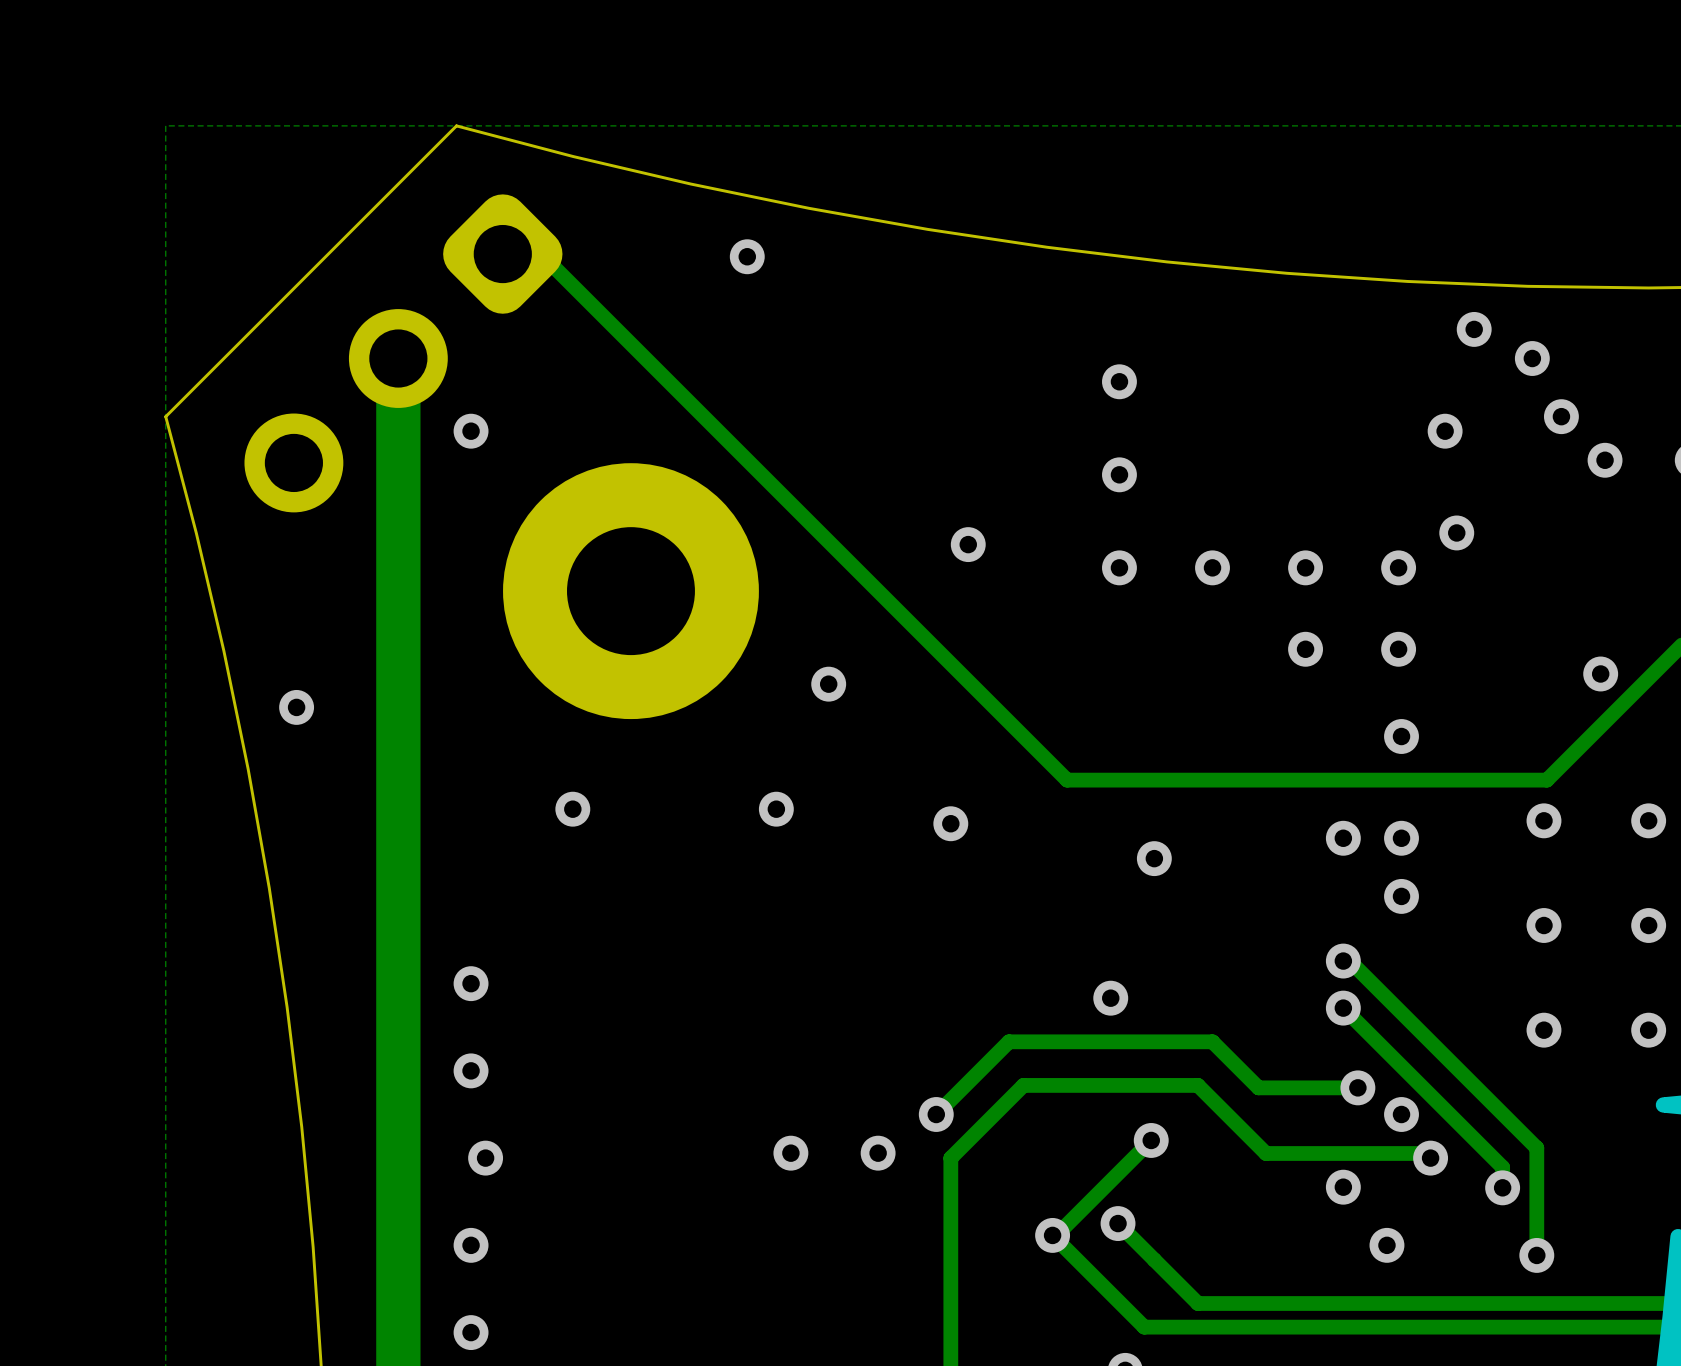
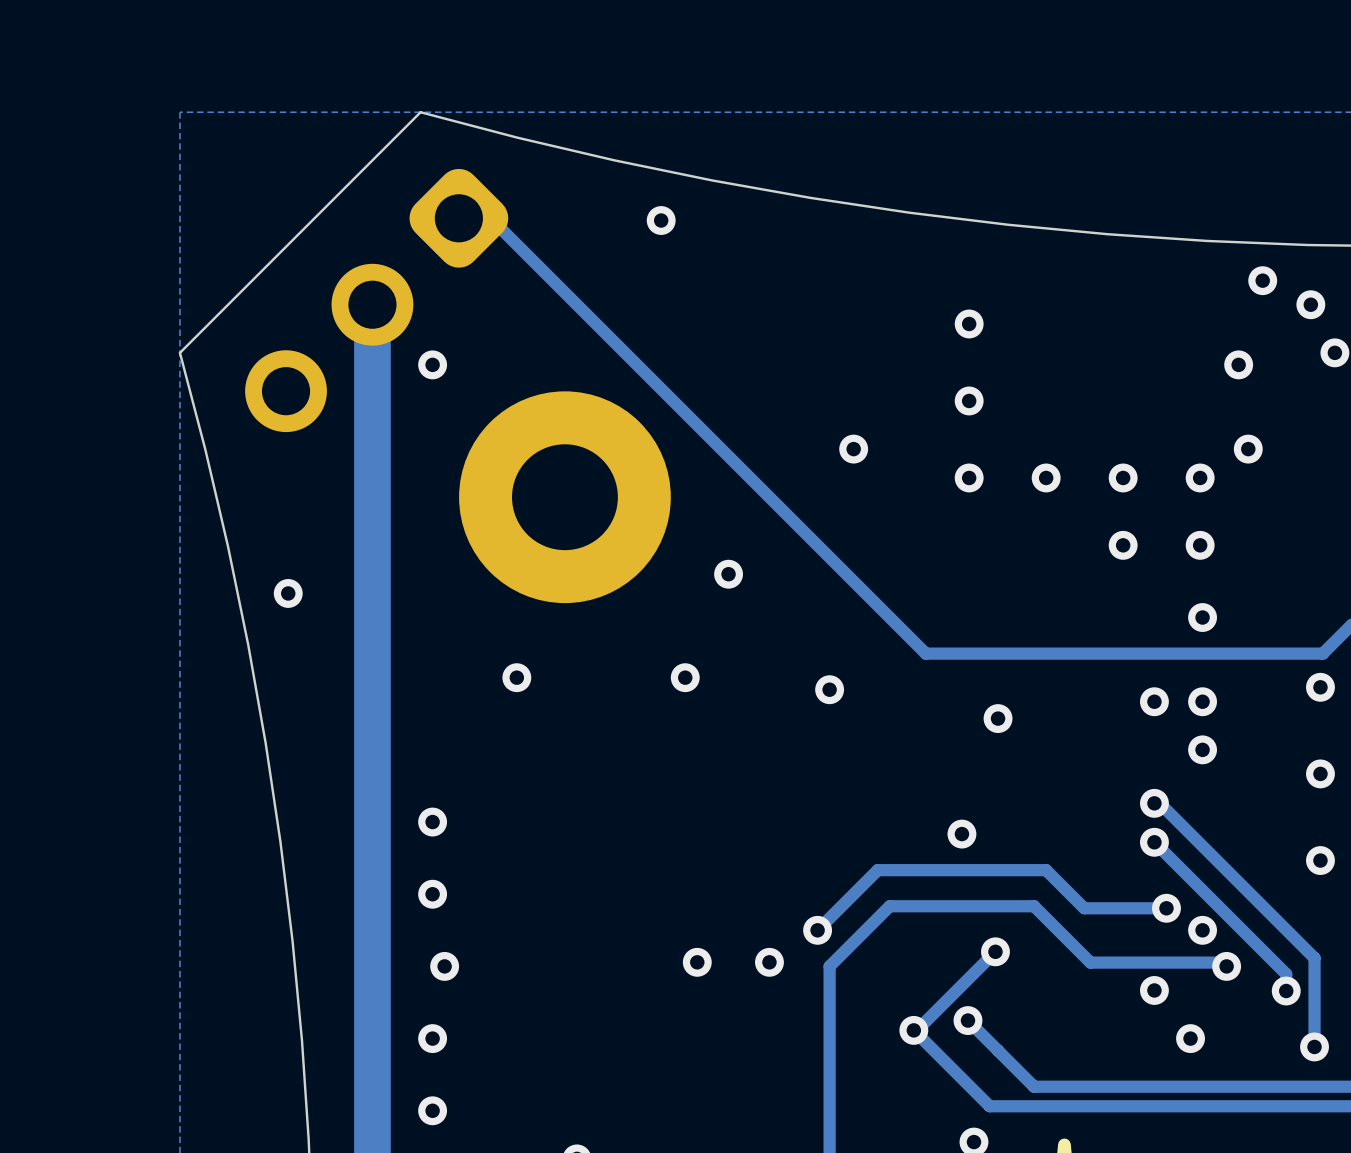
via position: (968, 544) -> (853, 449)

